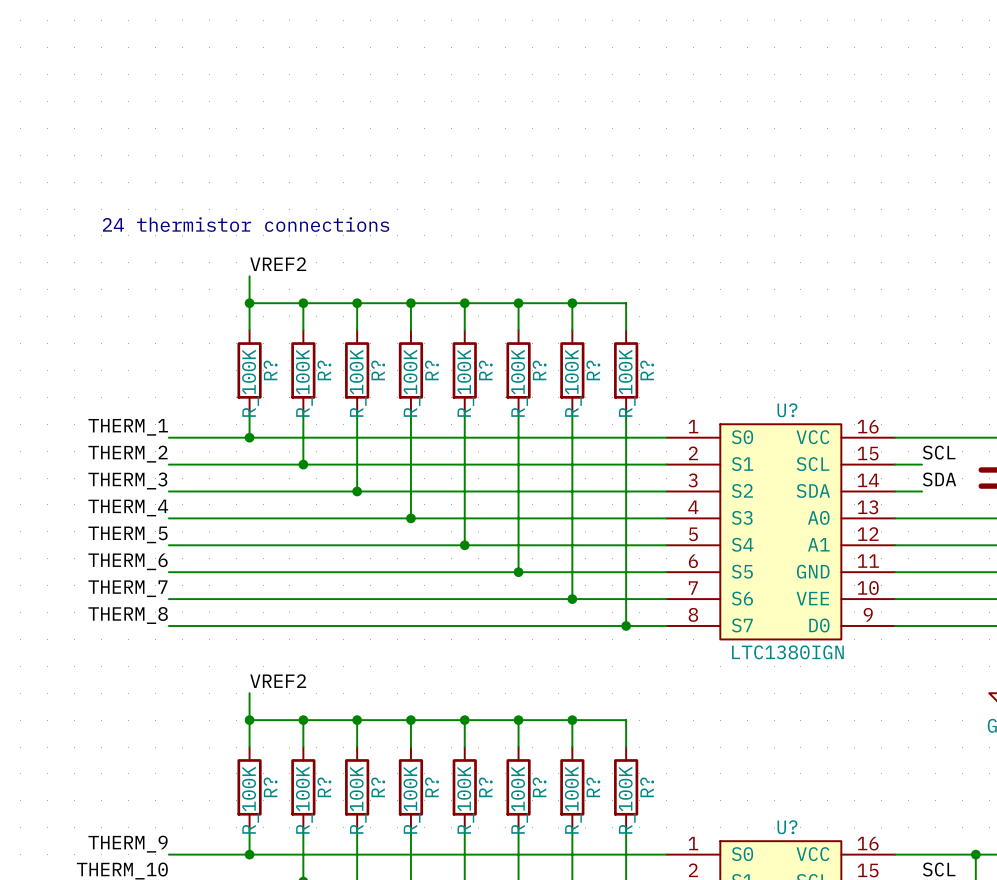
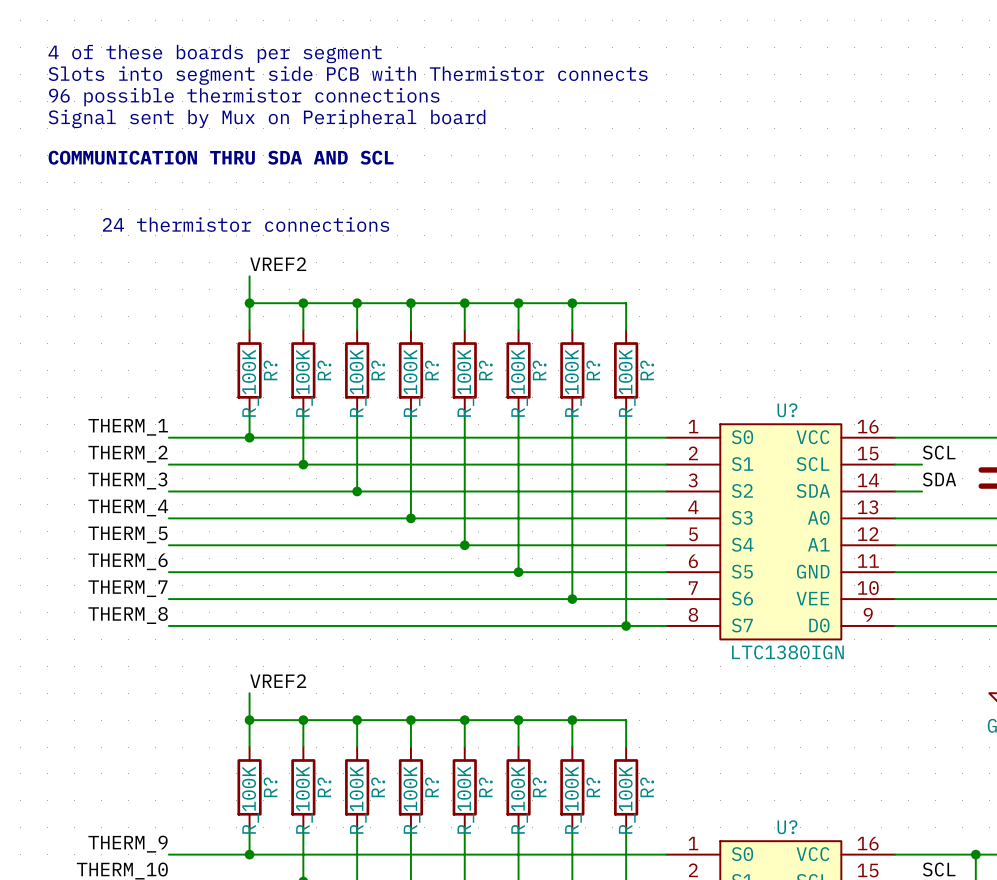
text: none -> 4 of these boards per segment (215, 54)
text: none -> Slots into segment side PCB with Thermistor connects (348, 75)
text: none -> 96 possible thermistor connections (244, 97)
text: none -> Signal sent by Mux on Peripheral board (267, 118)
text: none -> COMMUNICATION THRU SDA AND SCL (221, 157)

